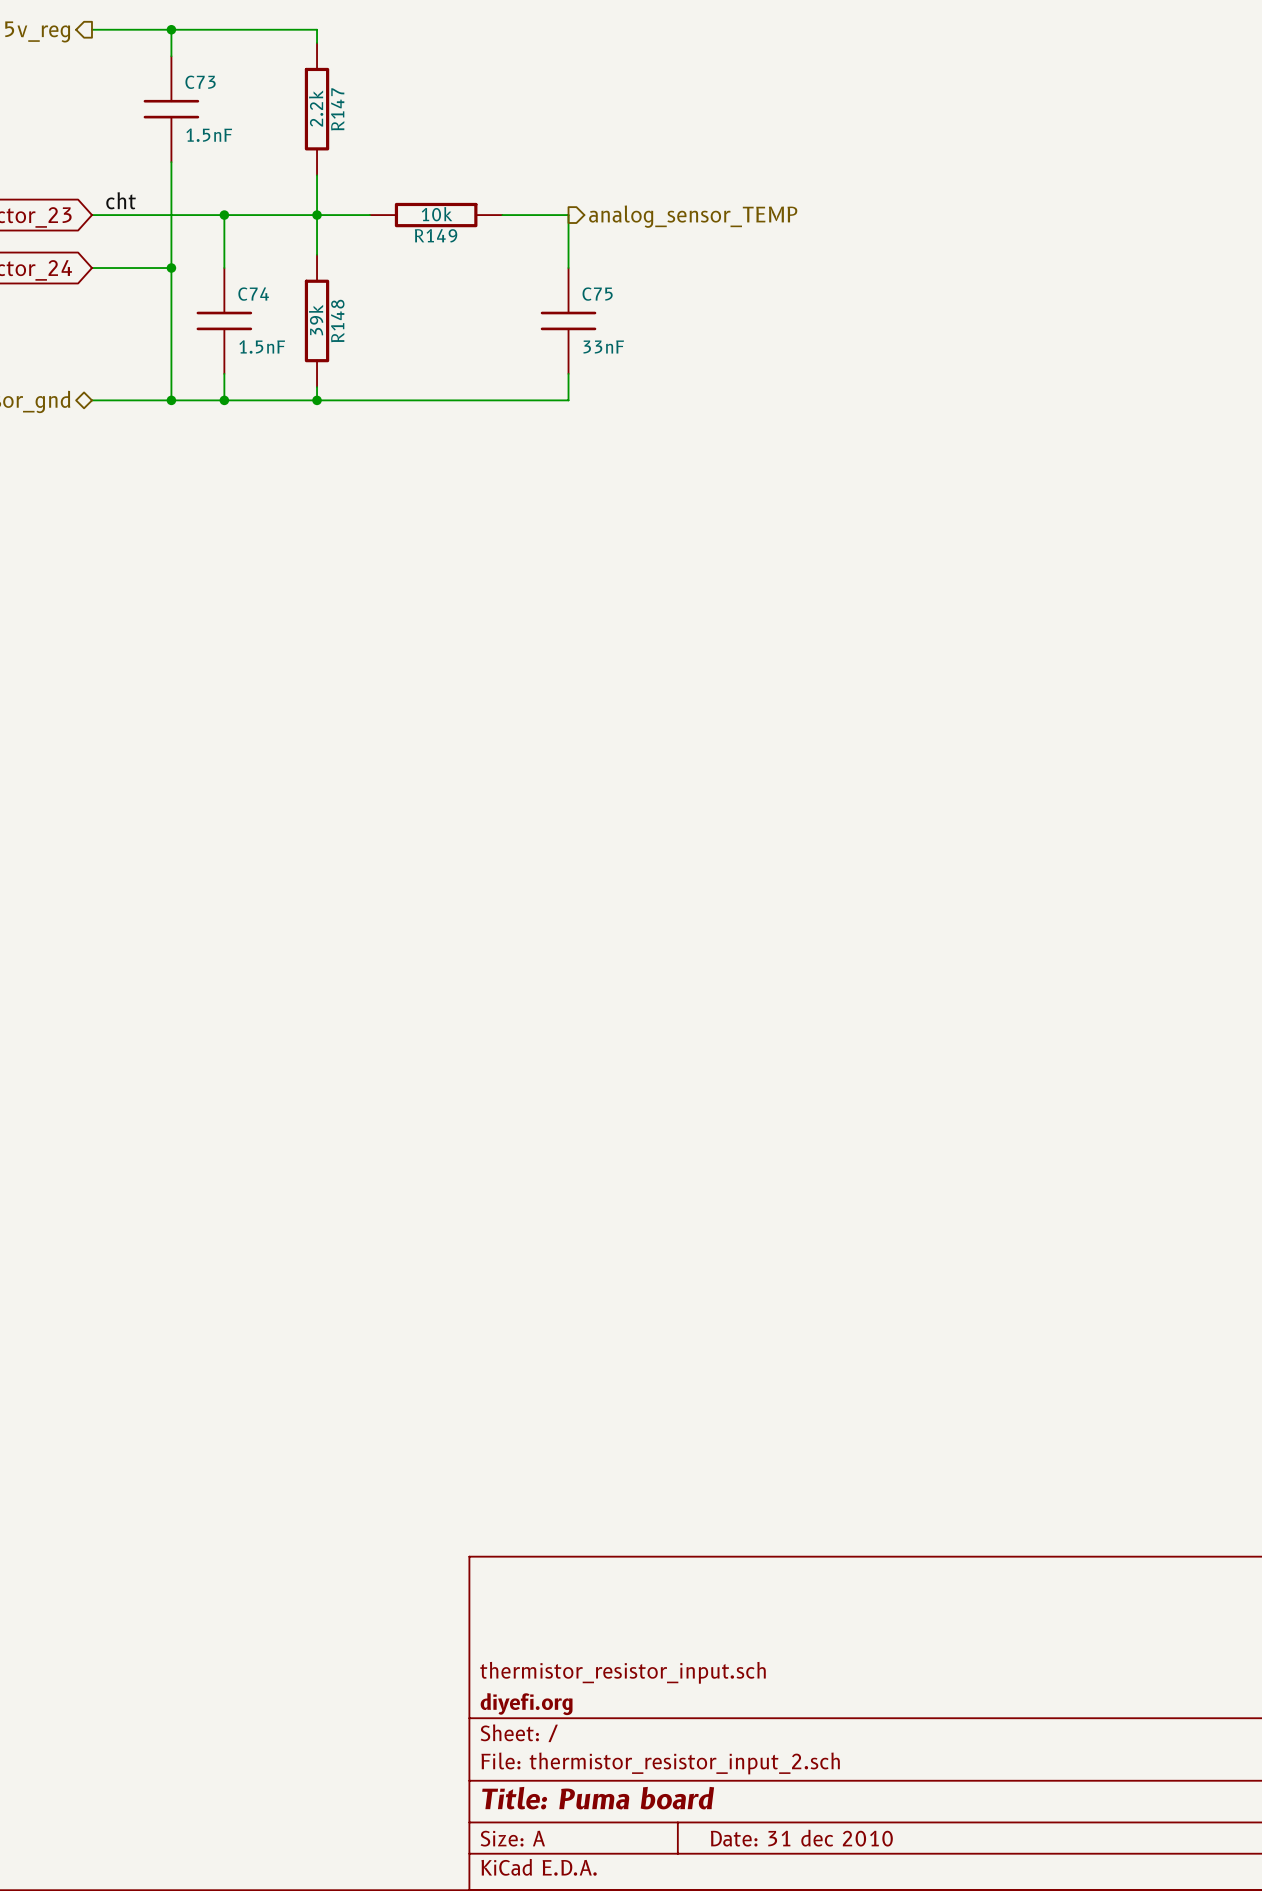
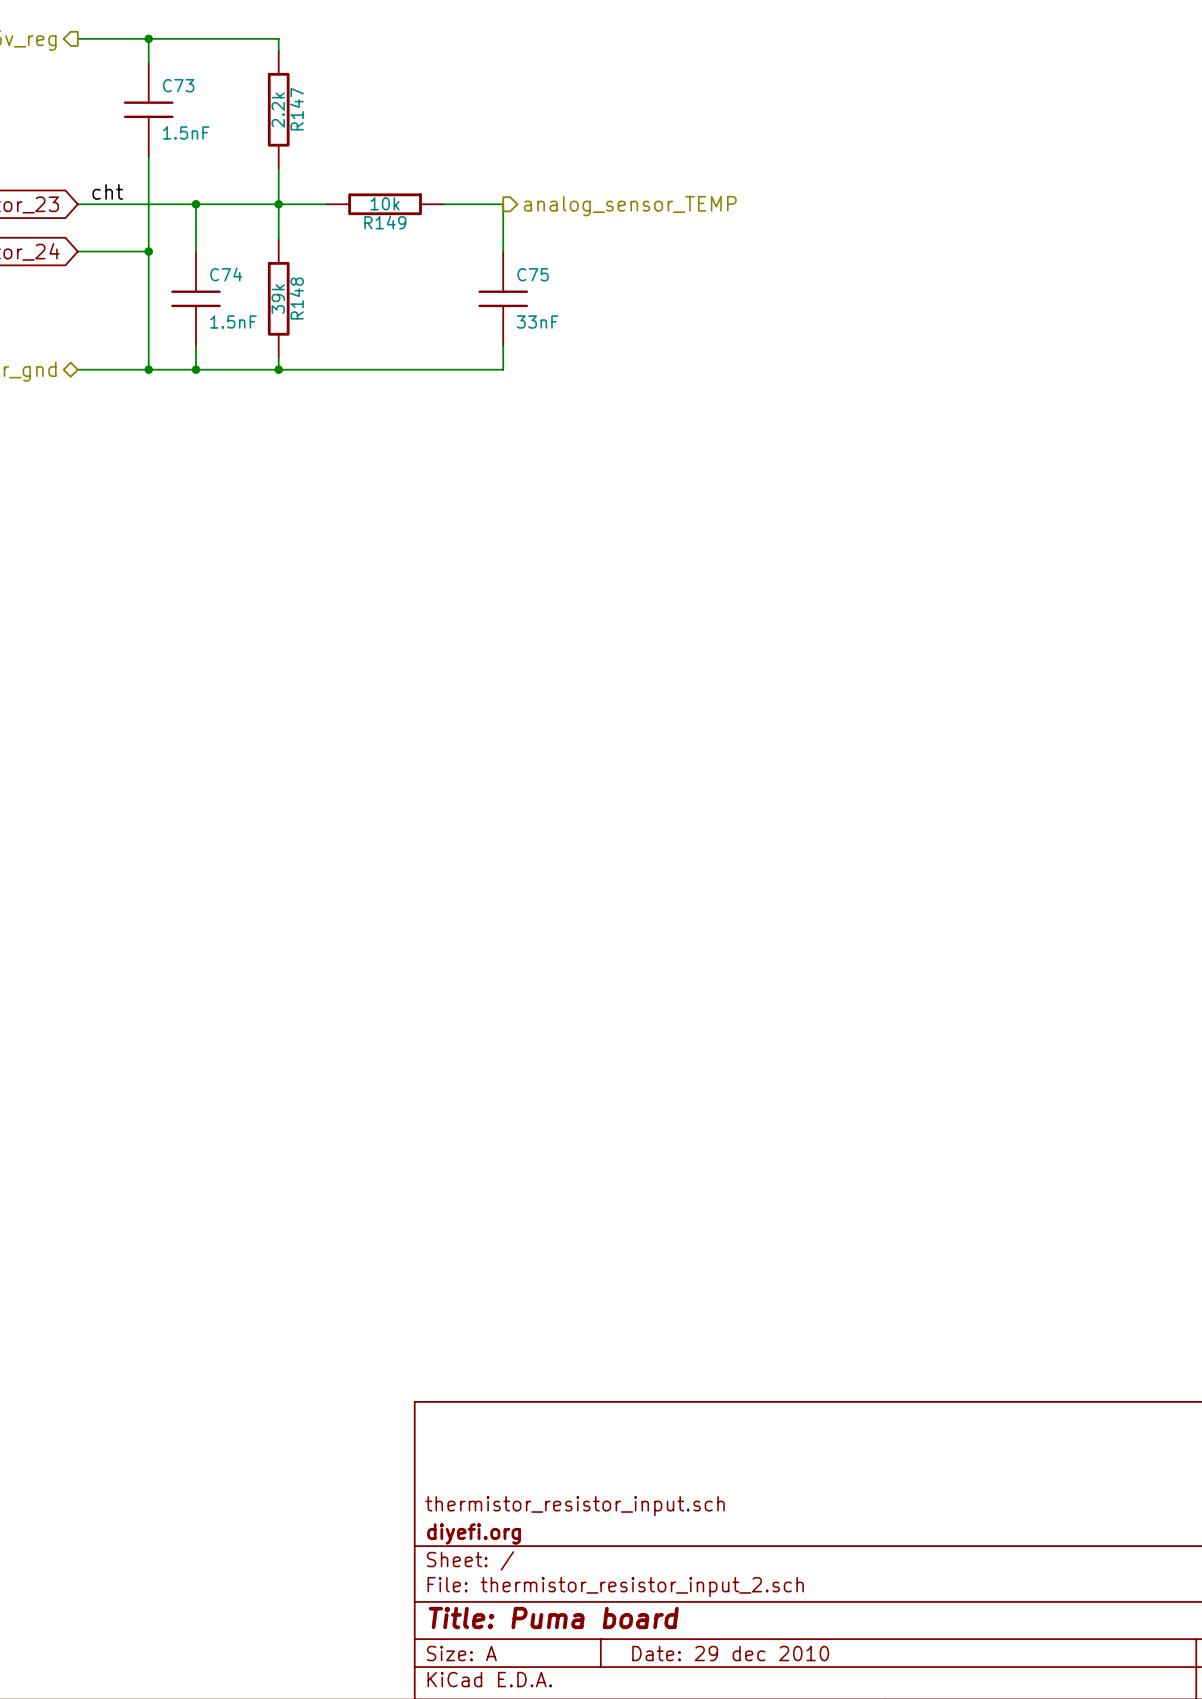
title block: Date: 31 dec 2010 (801, 1838) -> Date: 29 dec 2010 (730, 1653)

